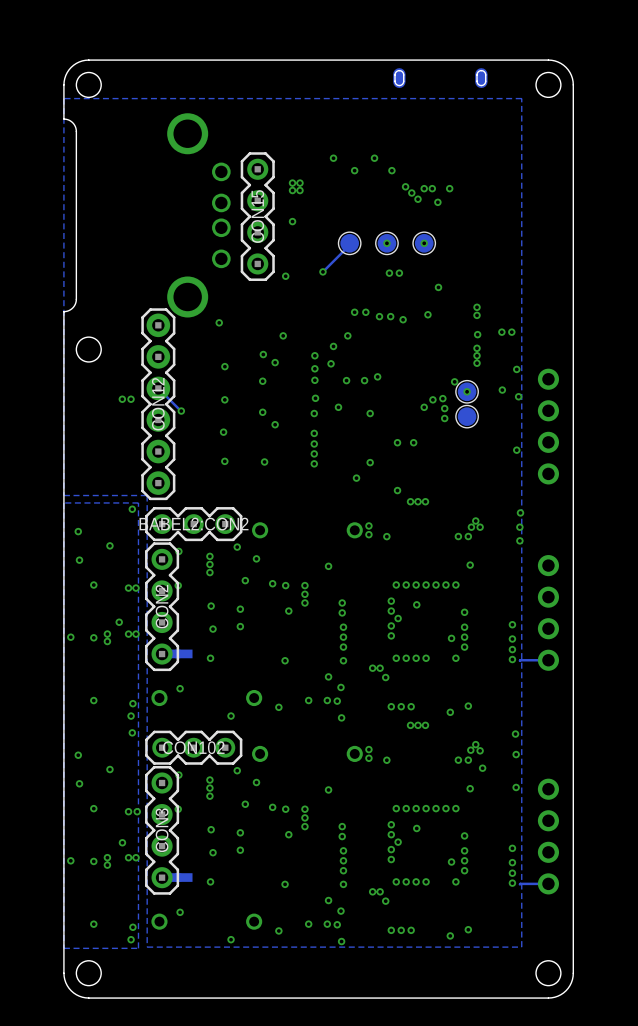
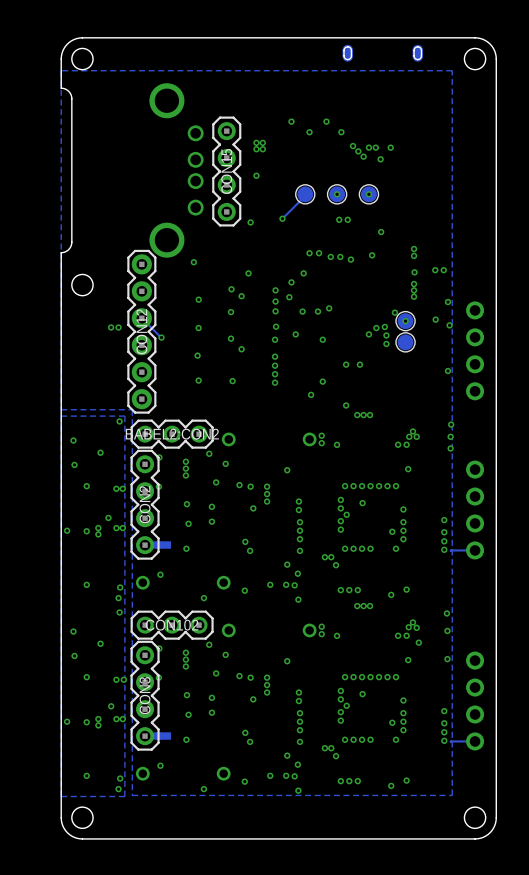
via: none -> (245, 541)
via: none -> (245, 732)

